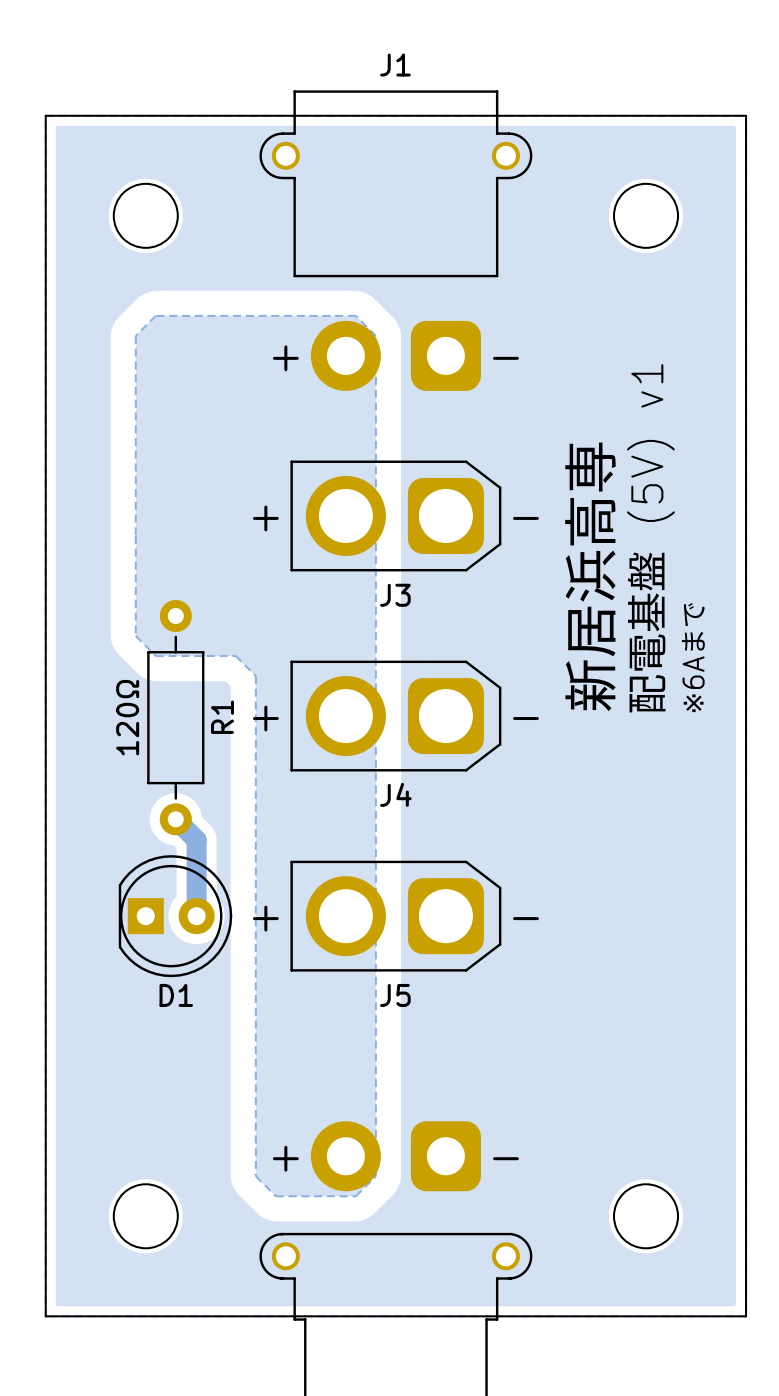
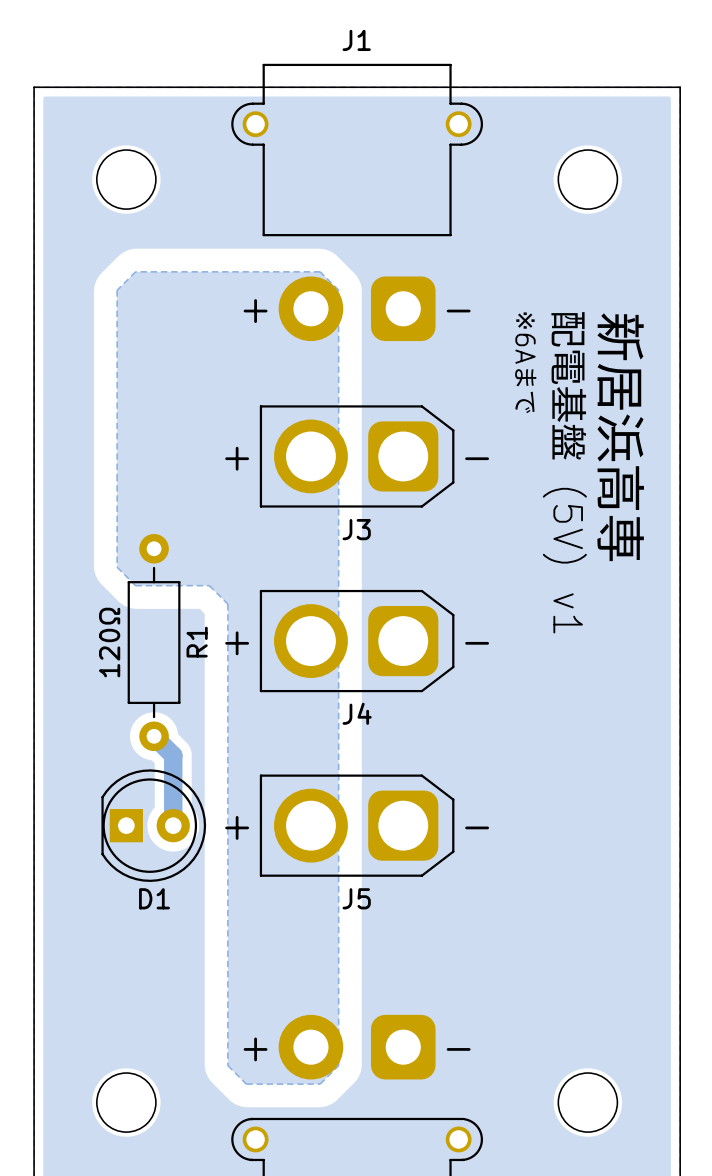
text rotation: 0° (650, 538) -> 180° (564, 472)
text rotation: 0° (590, 576) -> 180° (620, 437)
text rotation: 0° (693, 657) -> 180° (525, 362)
text position: ※6Aまで (693, 657) -> ※6Aまで (525, 362)

